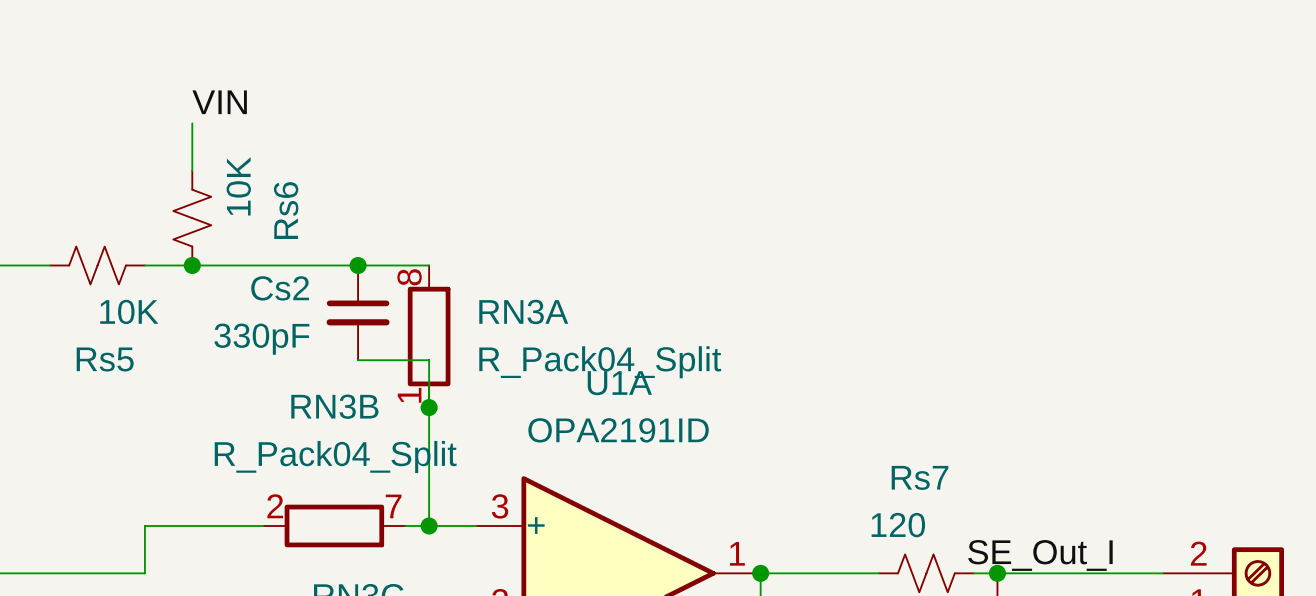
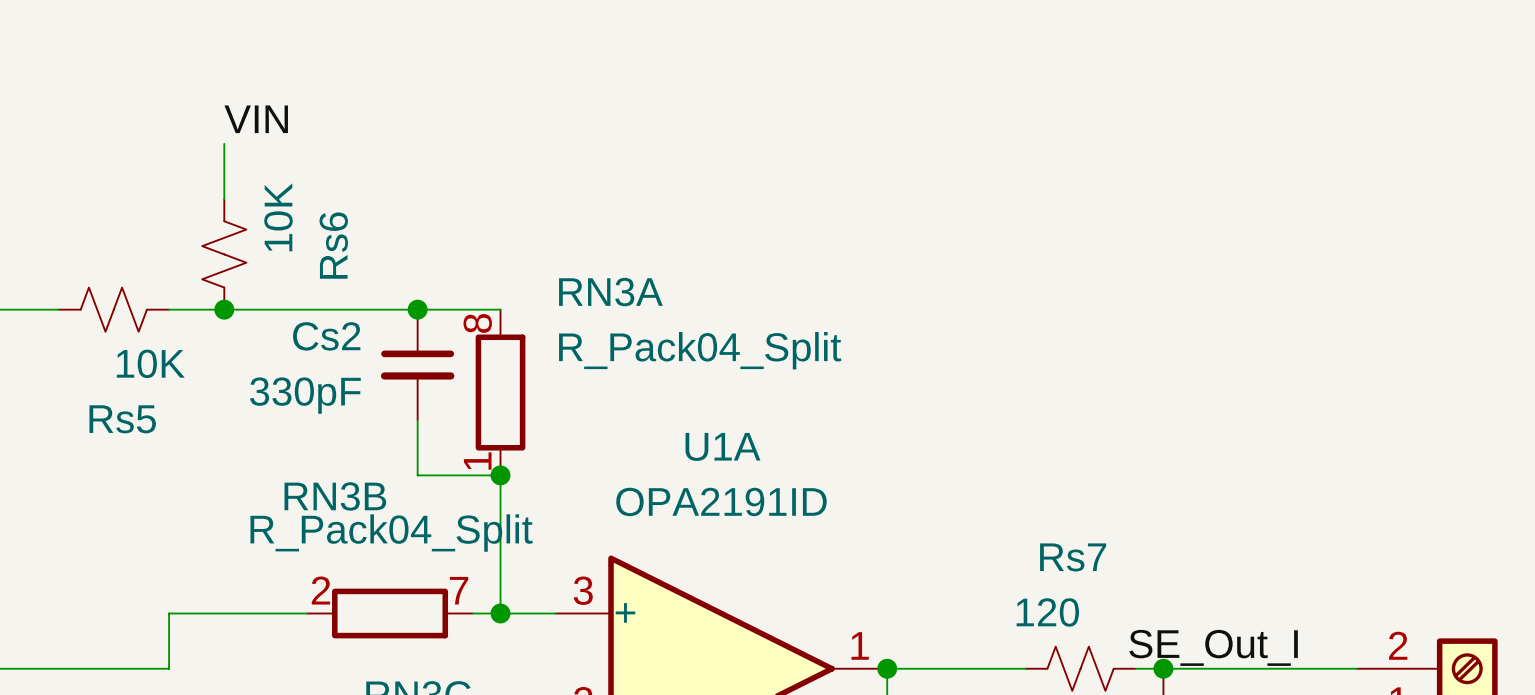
RN3A name position: RN3A (523, 311) -> RN3A (610, 292)
wire: (358, 360) (429, 360) (429, 407) -> (417, 420) (417, 475) (500, 475)
RN3A value position: R_Pack04_Split (600, 362) -> R_Pack04_Split (700, 350)
RN3B name position: RN3B (334, 406) -> RN3B (335, 496)

